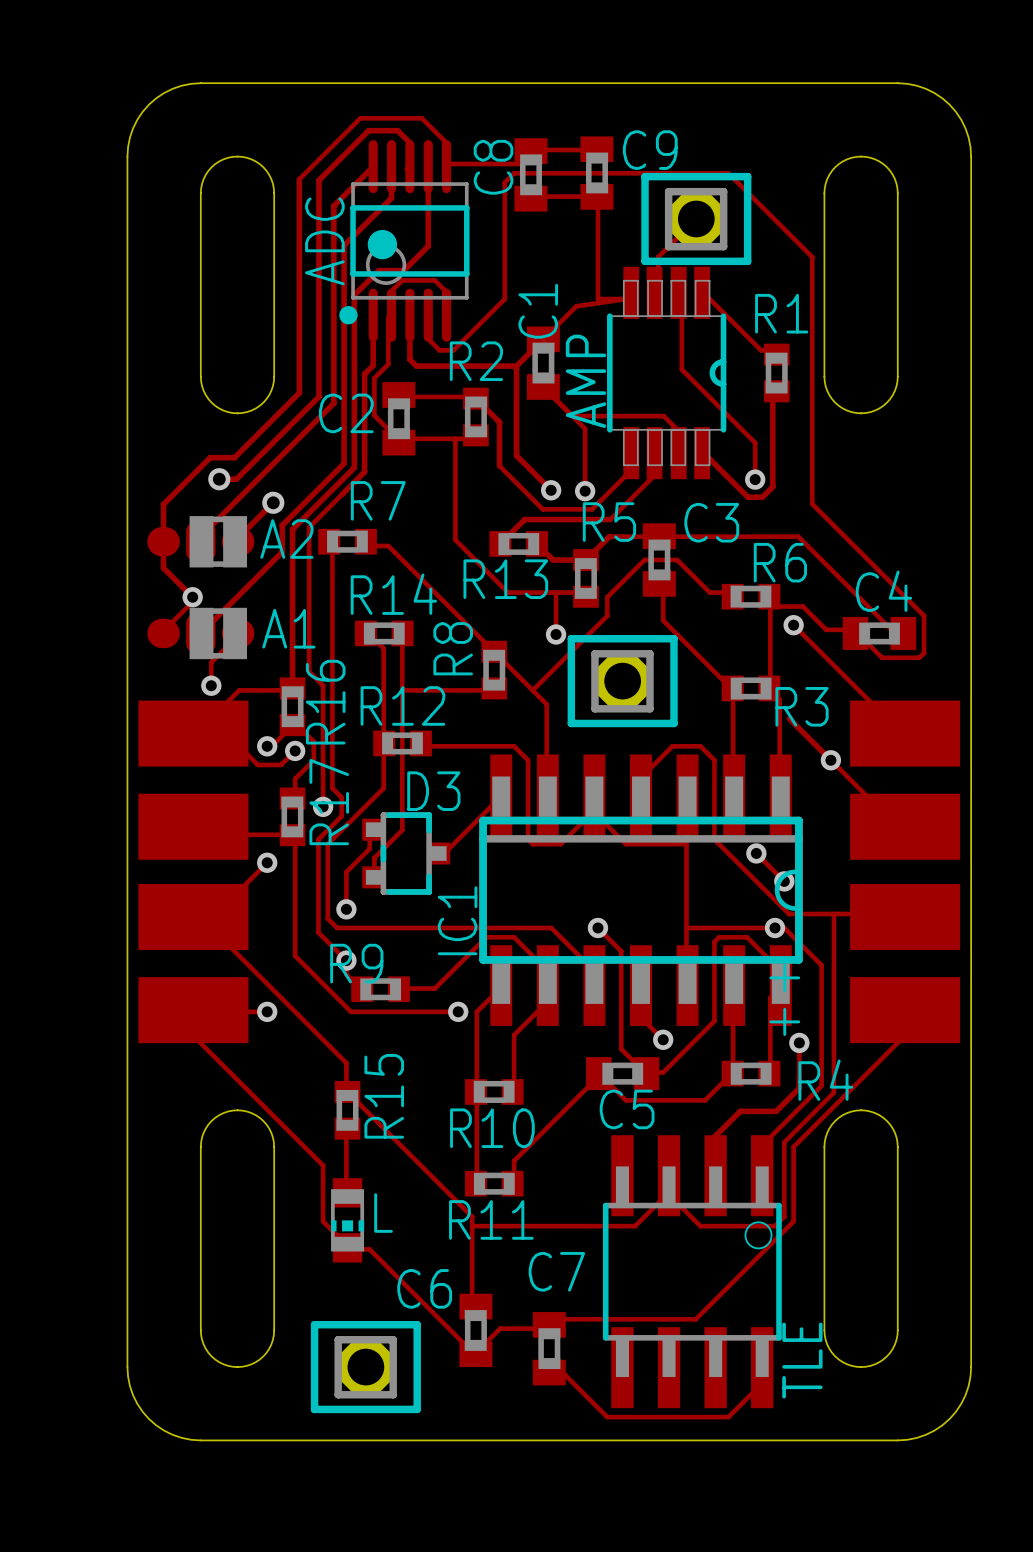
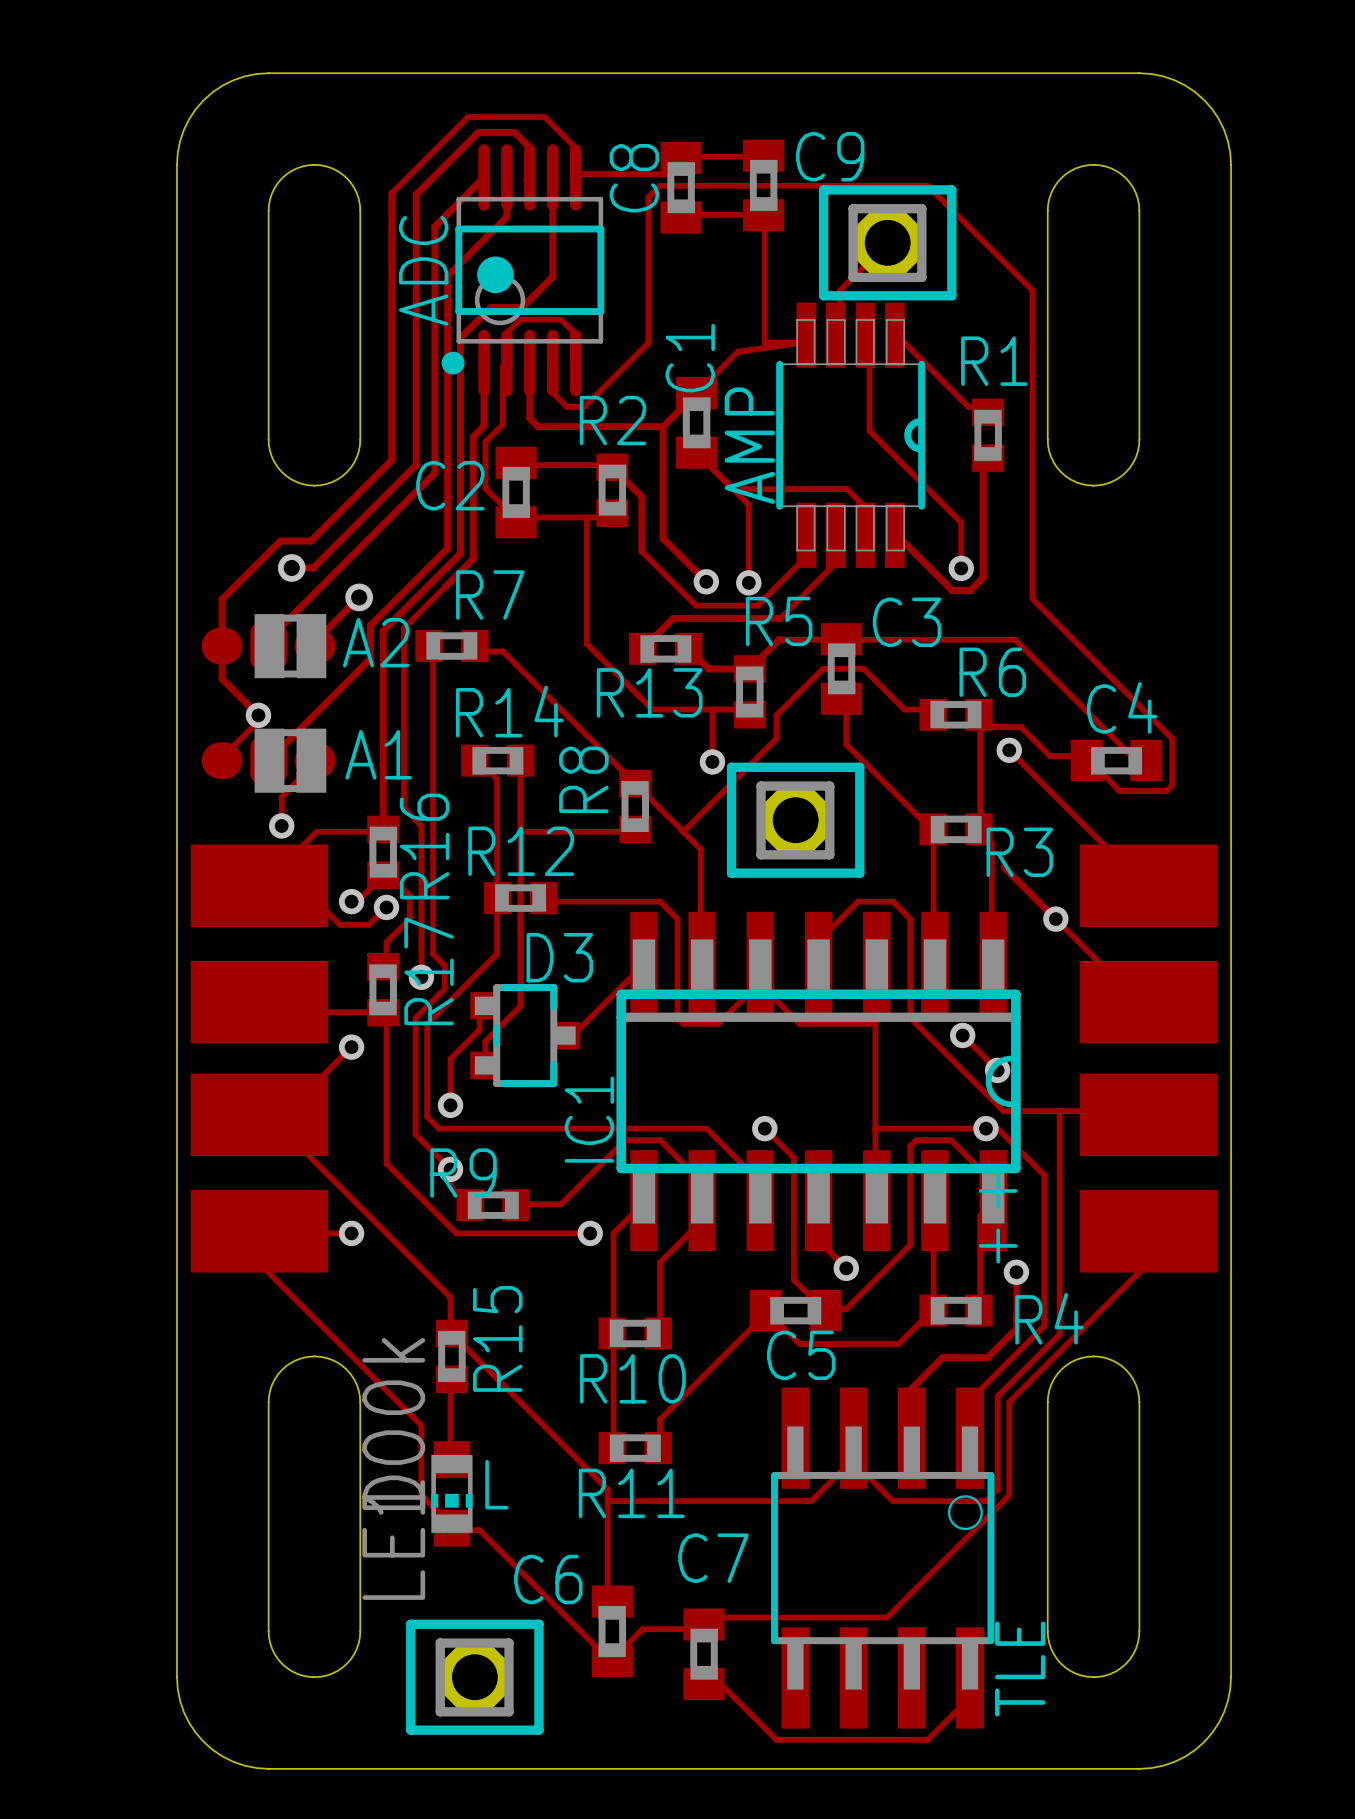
R15 value: none -> 100k (393, 1426)
L value: none -> LED (393, 1537)

